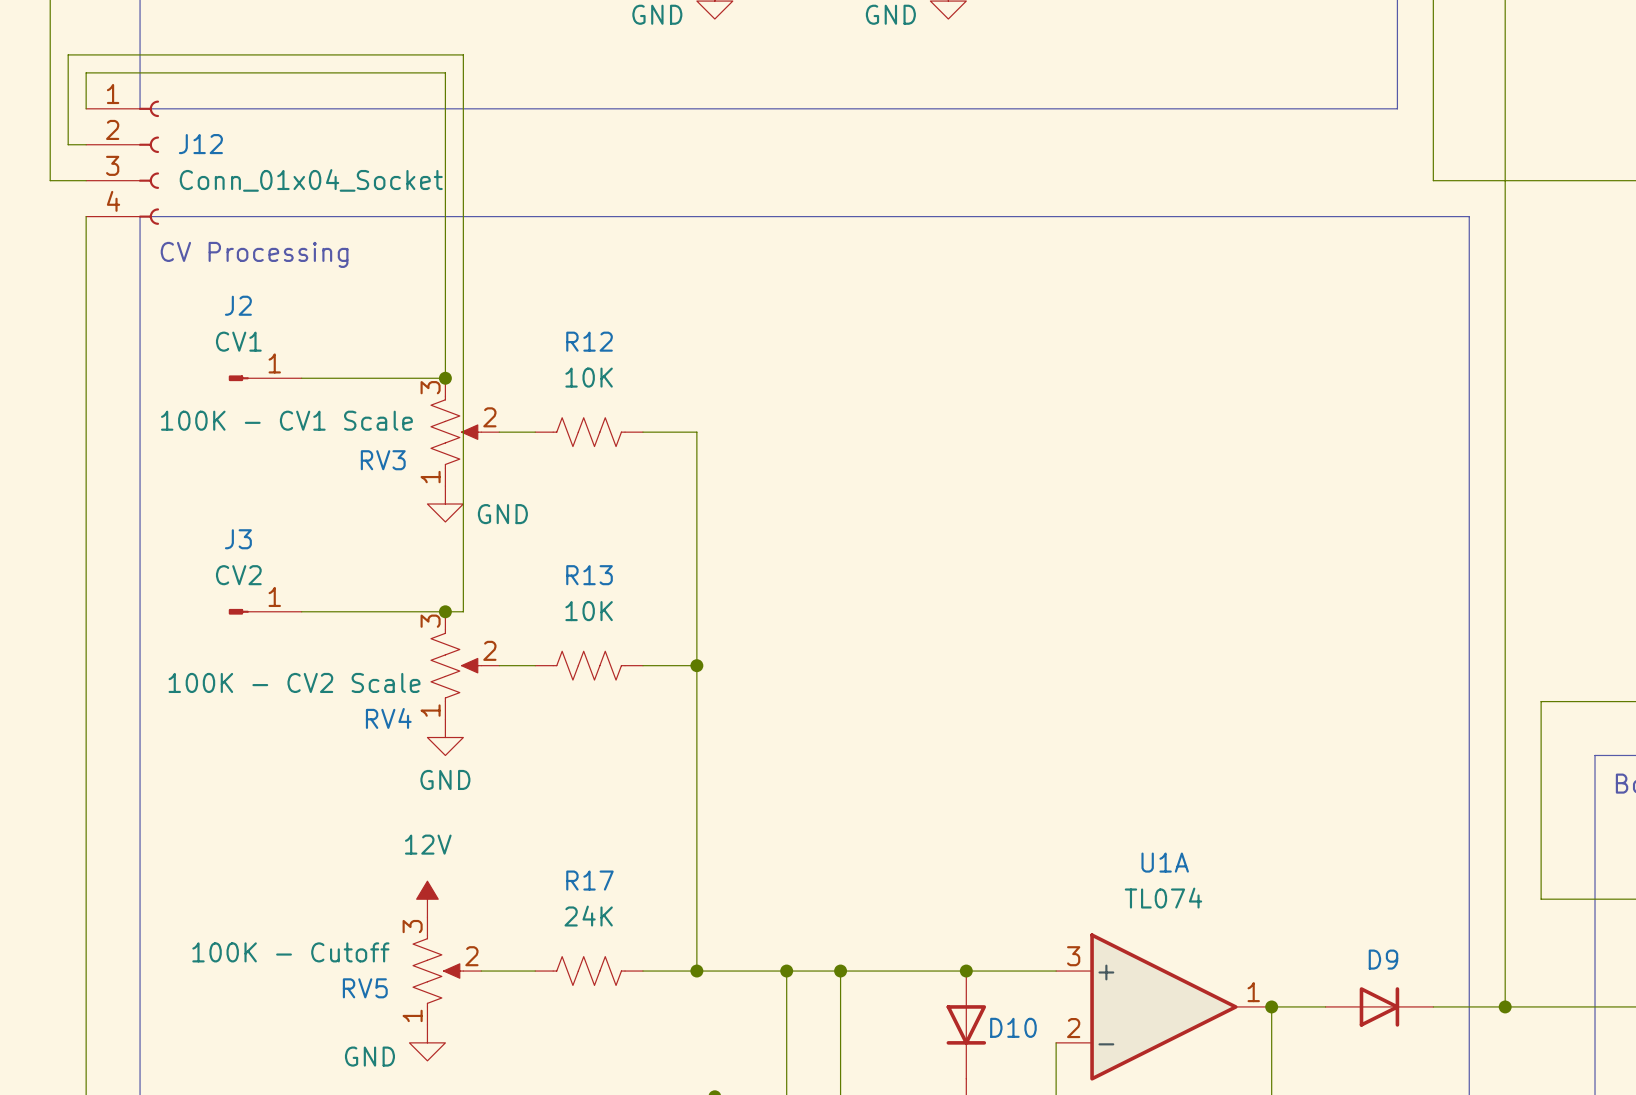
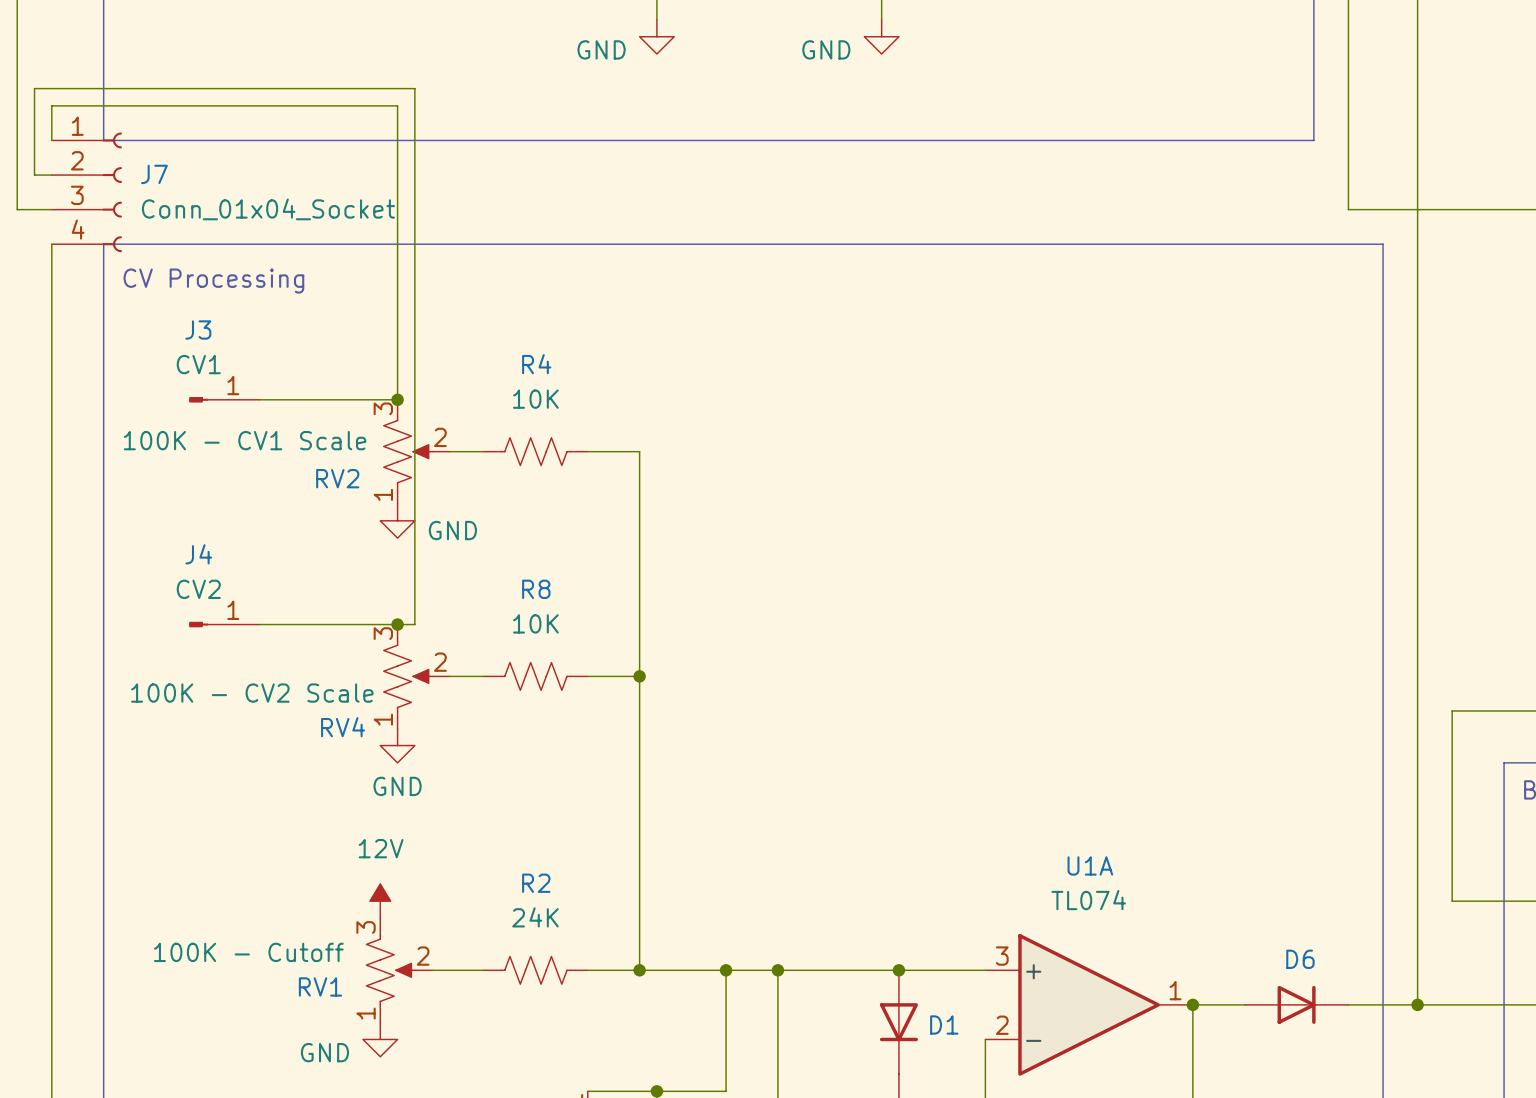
J12 name: J12 (200, 144) -> J7 (154, 174)
J2 name: J2 (238, 305) -> J3 (198, 329)
R12 name: R12 (589, 341) -> R4 (536, 364)
RV3 name: RV3 (383, 460) -> RV2 (337, 478)
J3 name: J3 (238, 539) -> J4 (198, 554)
R13 name: R13 (589, 575) -> R8 (536, 589)
R17 name: R17 (589, 880) -> R2 (536, 883)
D9 name: D9 (1383, 959) -> D6 (1300, 959)
RV5 name: RV5 (365, 988) -> RV1 (320, 986)
D10 name: D10 (1013, 1027) -> D1 (944, 1024)

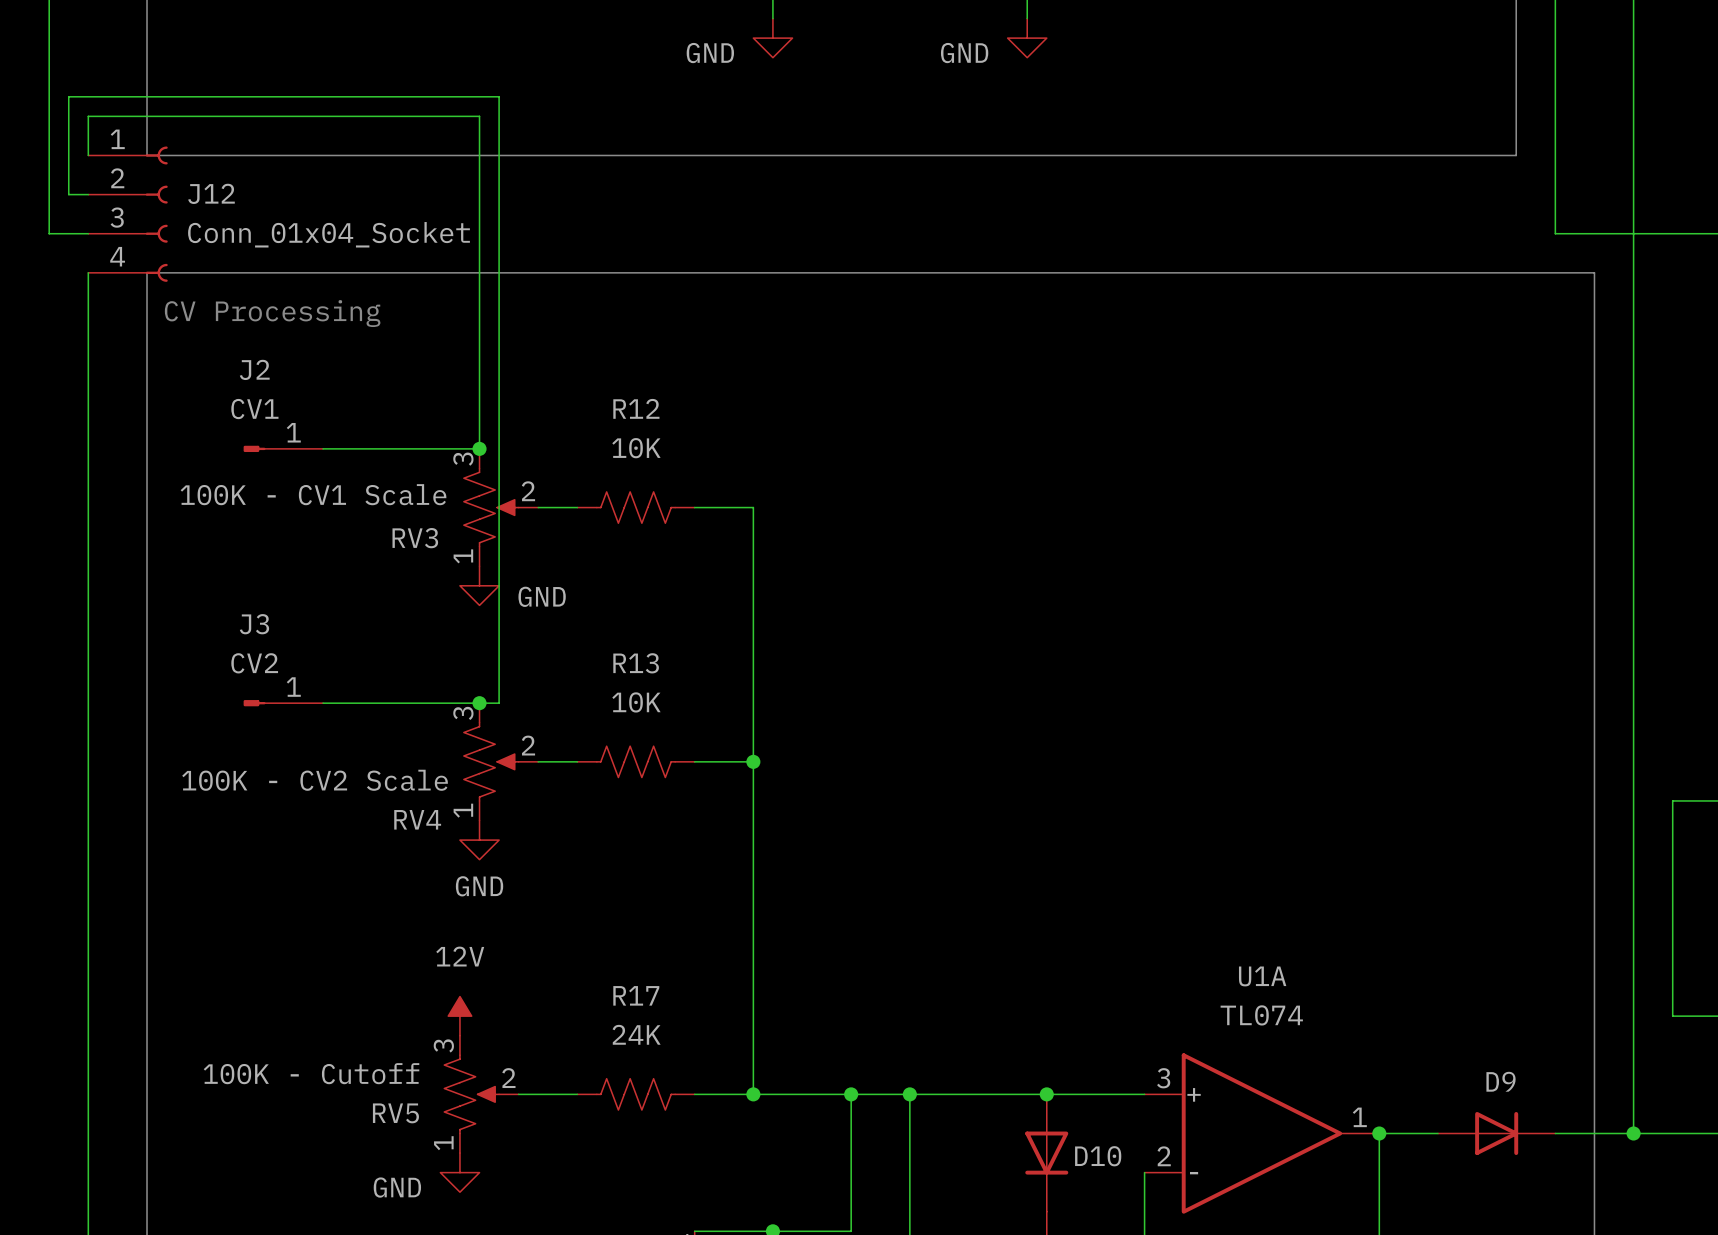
J7 name: J7 (154, 174) -> J12 (211, 193)
J3 name: J3 (198, 329) -> J2 (254, 369)
R4 name: R4 (536, 364) -> R12 (636, 408)
RV2 name: RV2 (337, 478) -> RV3 (415, 538)
J4 name: J4 (198, 554) -> J3 (254, 624)
R8 name: R8 (536, 589) -> R13 (636, 663)
R2 name: R2 (536, 883) -> R17 (636, 995)
D6 name: D6 (1300, 959) -> D9 (1501, 1081)
RV1 name: RV1 (320, 986) -> RV5 (395, 1113)
D1 name: D1 (944, 1024) -> D10 (1098, 1156)

